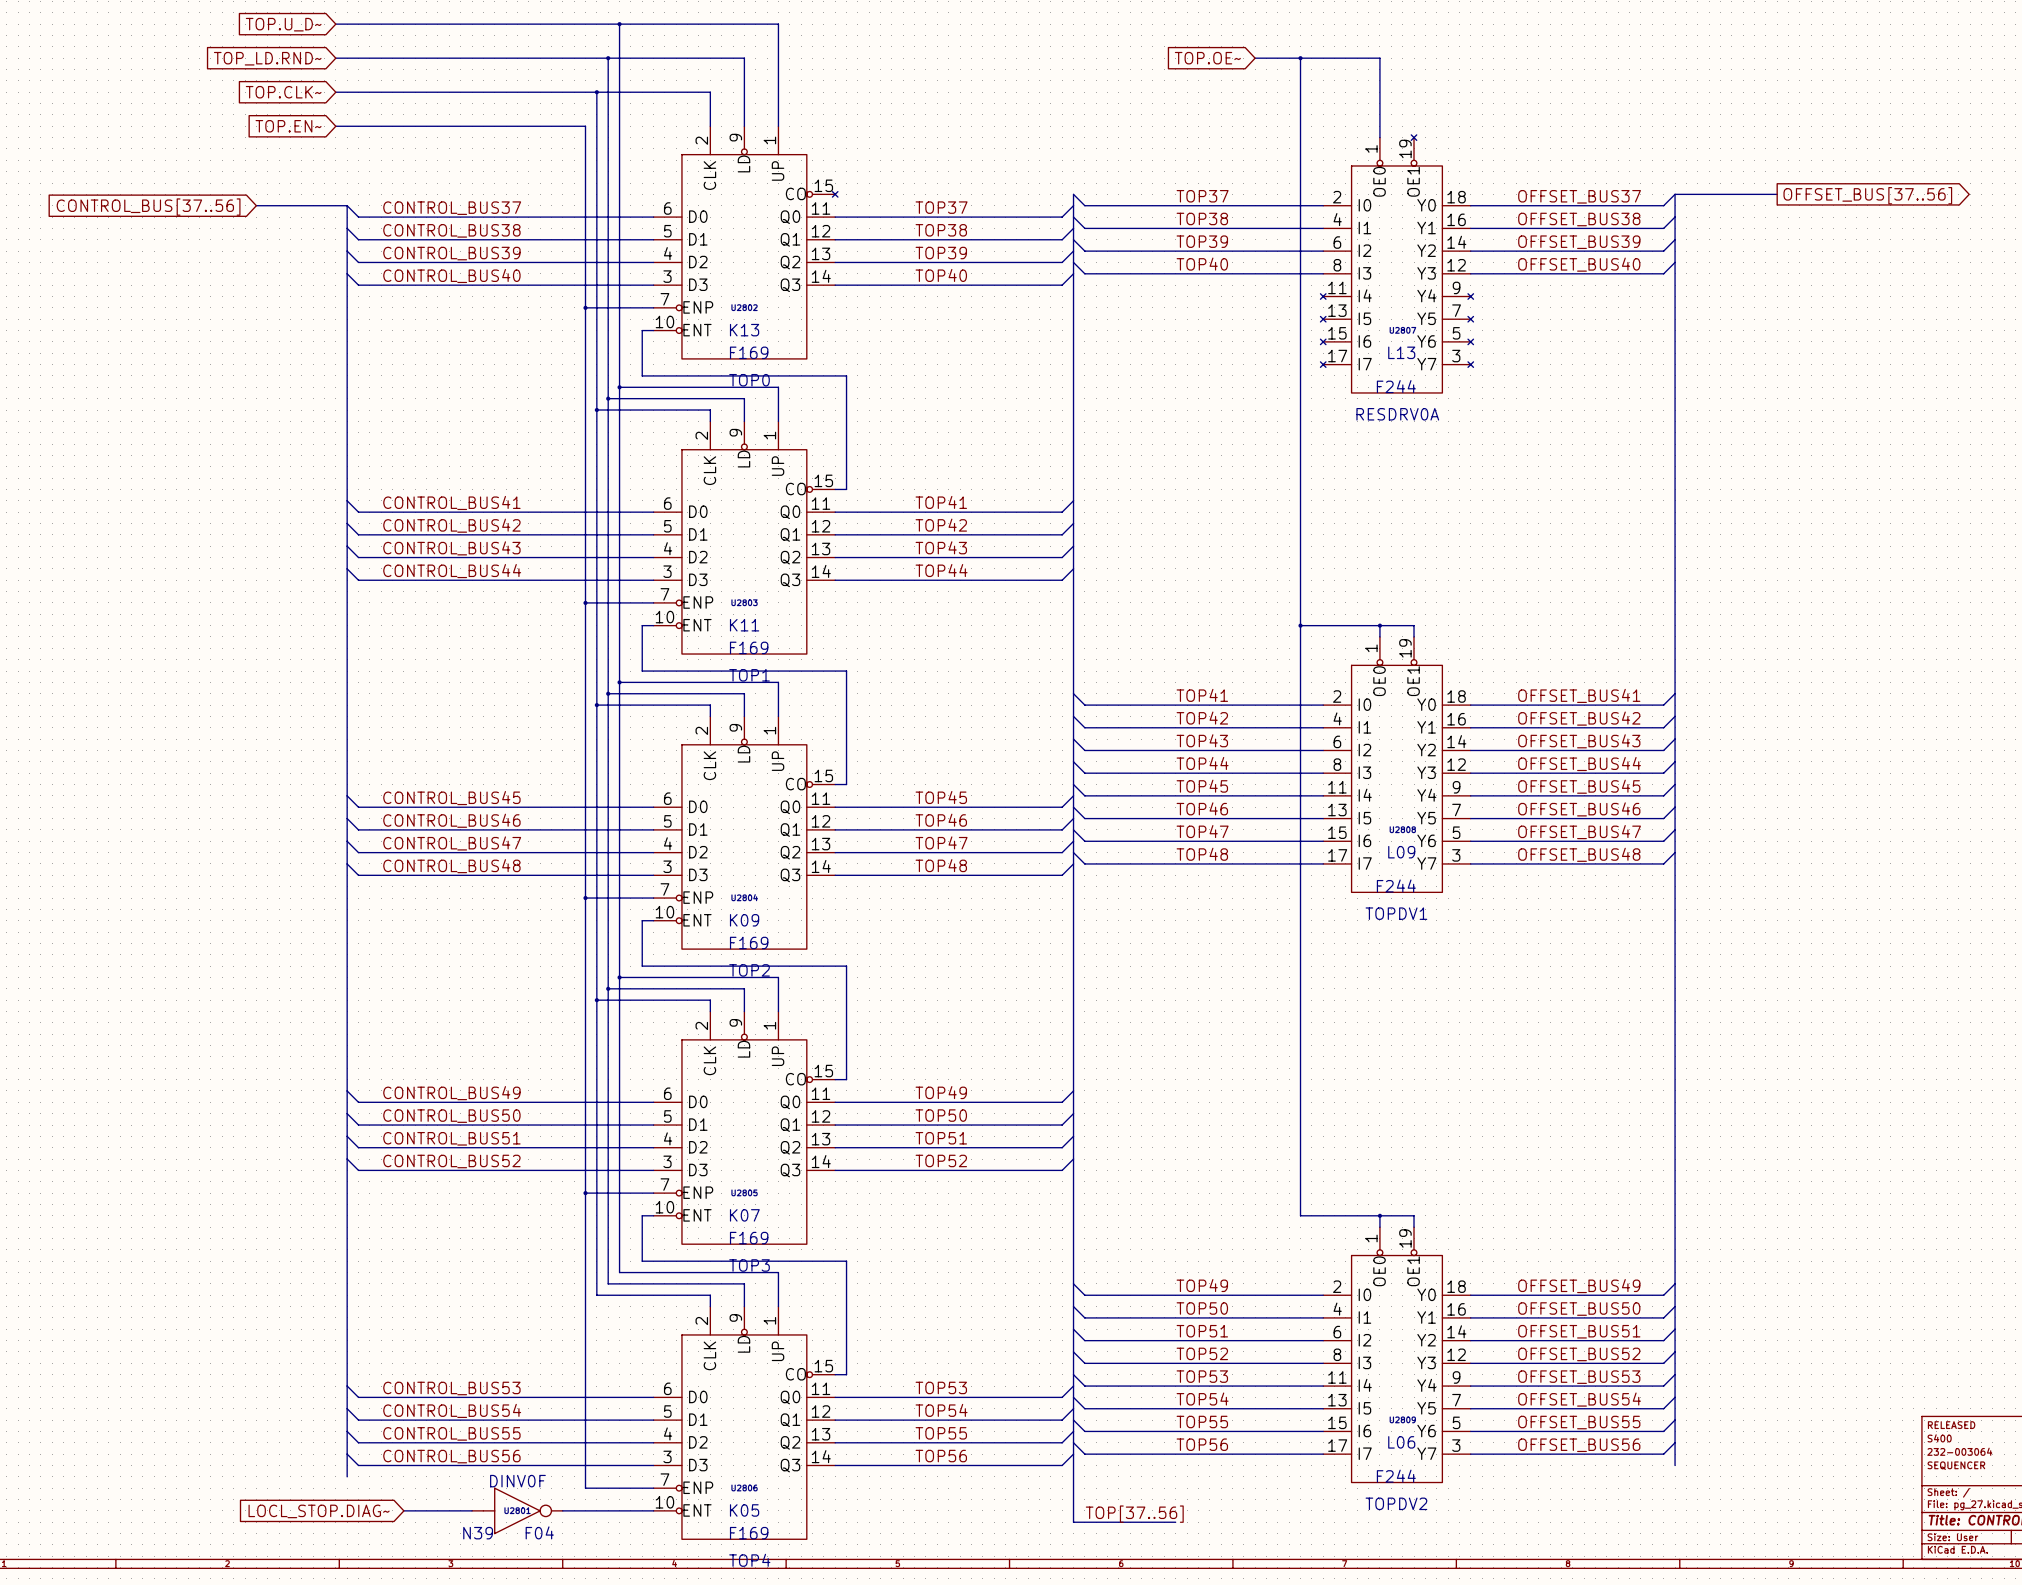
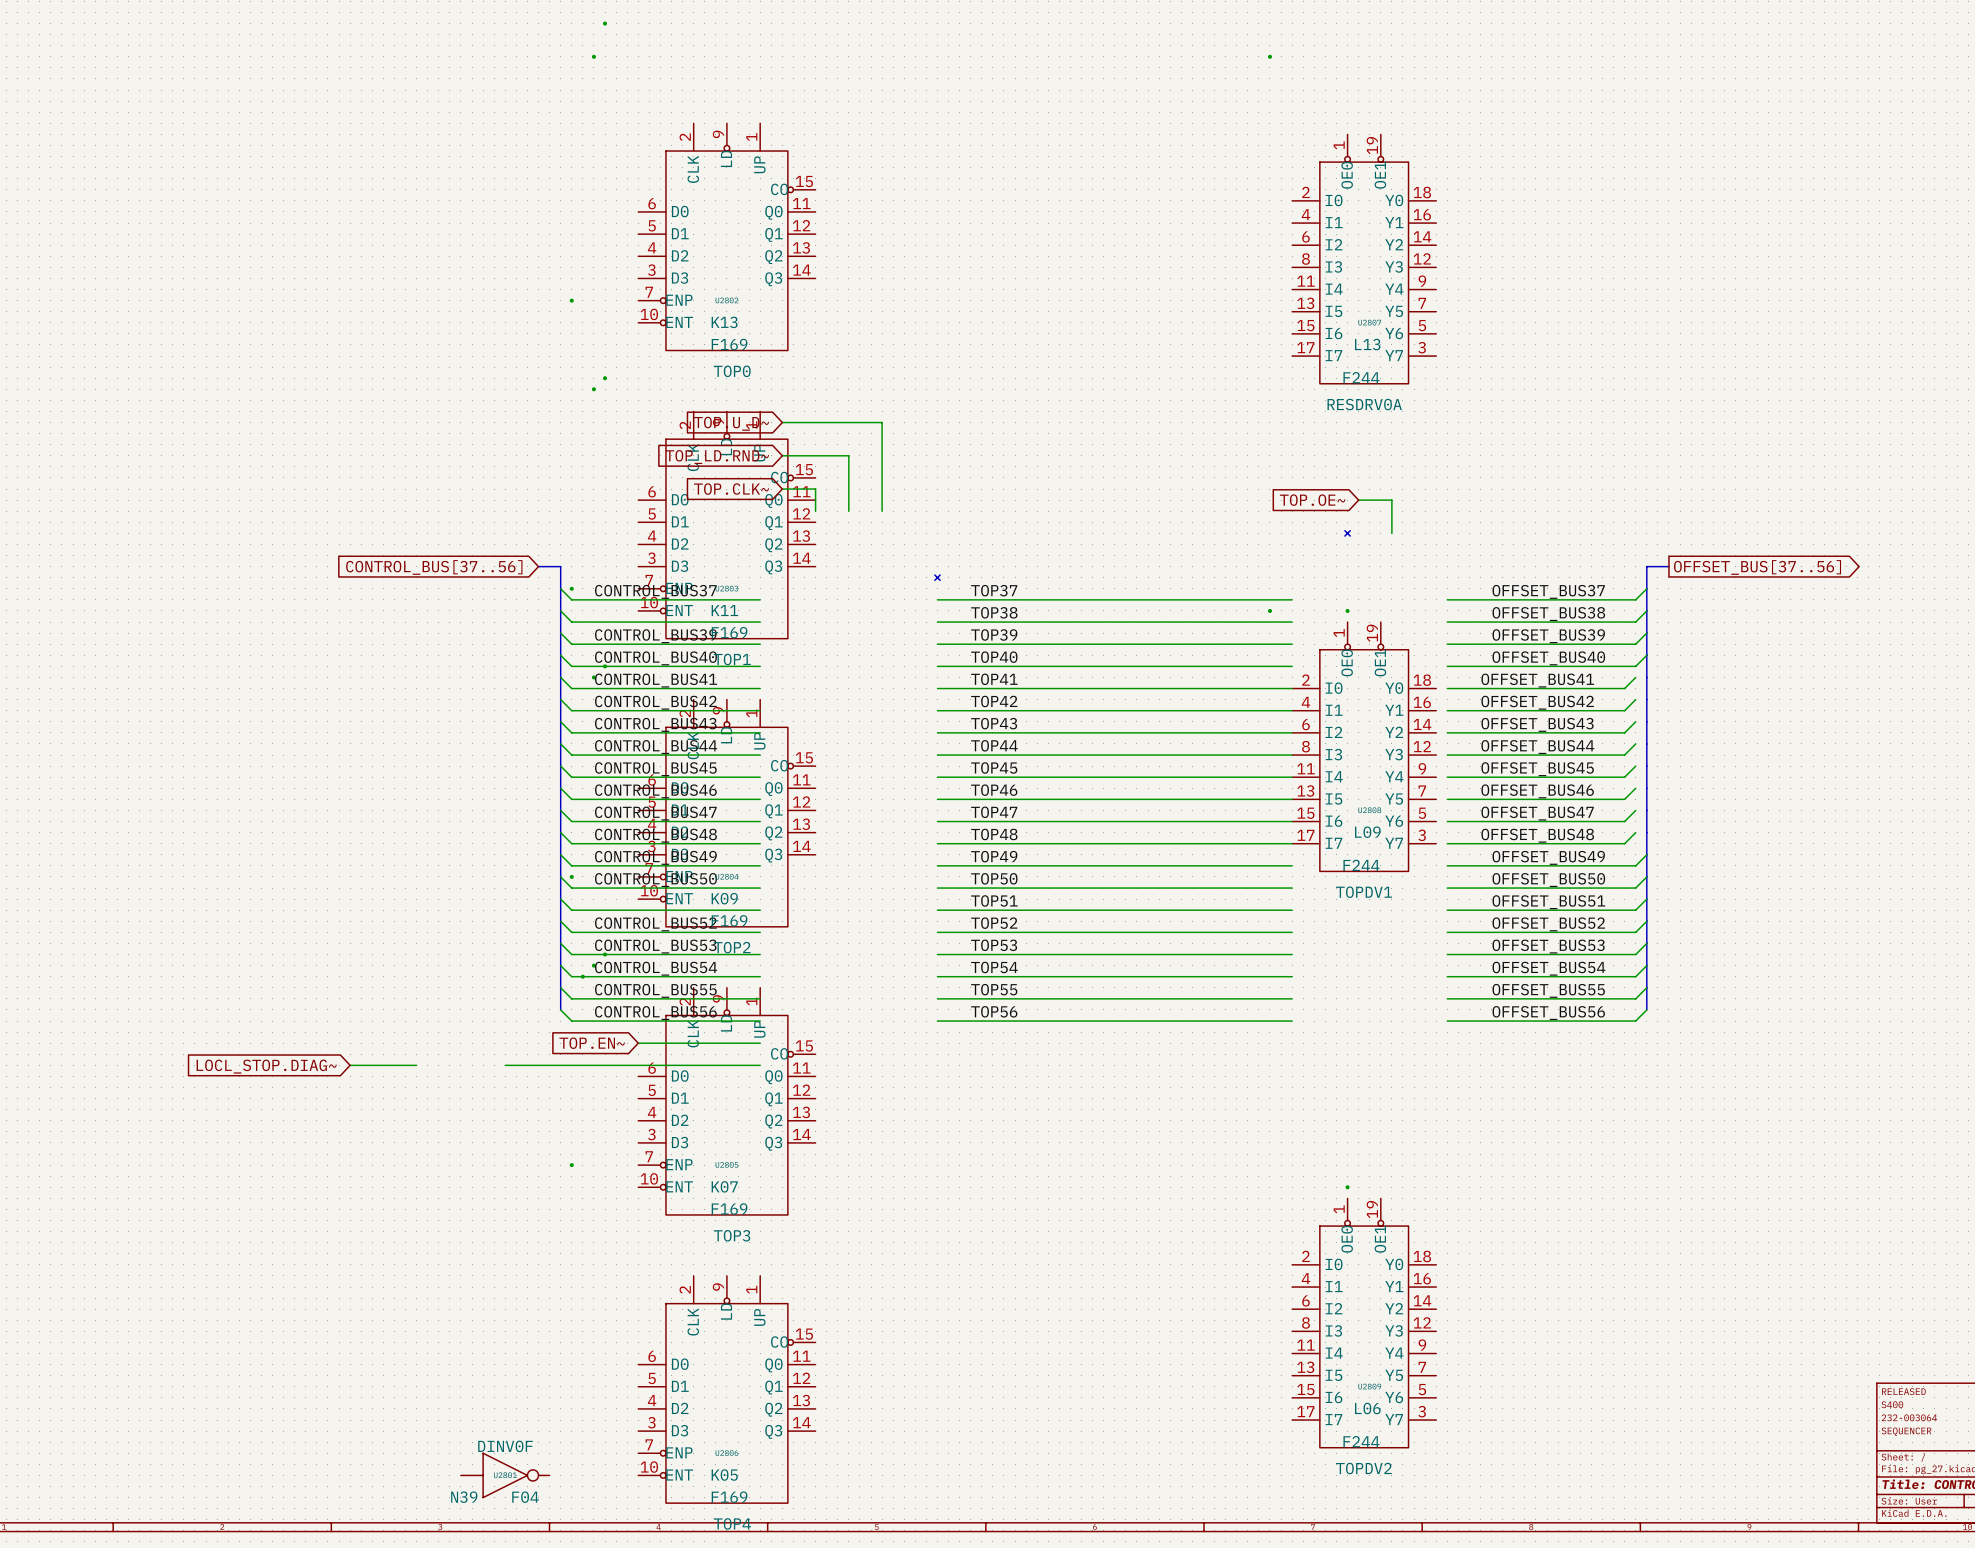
global label: TOP.U_D~ (283, 24) -> none
wire: (335, 24) (778, 24) (778, 126) -> none
wire: (619, 24) (619, 1272) (778, 1272) (778, 1306) -> none
global label: TOP_LD.RND~ (267, 58) -> none
wire: (335, 58) (744, 58) (744, 126) -> none
wire: (608, 58) (608, 1283) (744, 1283) (744, 1306) -> none
global label: TOP.OE~ (1207, 58) -> none
wire: (1255, 58) (1379, 58) (1379, 137) -> none
wire: (1300, 58) (1300, 1215) (1414, 1215) (1414, 1227) -> none
global label: TOP.CLK~ (283, 92) -> none
wire: (335, 92) (710, 92) (710, 126) -> none
wire: (596, 92) (596, 1295) (710, 1295) (710, 1306) -> none
junction: (596, 92) -> none
global label: TOP.EN~ (288, 126) -> none
wire: (335, 126) (585, 126) (585, 1488) (653, 1488) -> none
no-connect mark: (1414, 137) -> none
no-connect mark: (835, 194) -> none
bus: (1073, 194) (1073, 1522) (1175, 1522) -> none
wire: (1073, 194) (1084, 205) (1323, 205) -> none
wire: (1675, 194) (1663, 205) (1470, 205) -> none
bus: (1777, 194) (1675, 194) (1675, 1465) -> none
global label: OFFSET_BUS[37..56] (1867, 195) -> none
label: TOP37 (1202, 196) -> none
label: OFFSET_BUS37 (1579, 196) -> none
bus: (256, 205) (347, 205) (347, 1476) -> none
wire: (347, 205) (358, 217) (653, 217) -> none
wire: (1073, 205) (1062, 217) (835, 217) -> none
global label: CONTROL_BUS[37..56] (148, 207) -> none
label: TOP37 (941, 207) -> none
label: CONTROL_BUS37 (452, 208) -> none
wire: (1073, 217) (1084, 228) (1323, 228) -> none
wire: (1675, 217) (1663, 228) (1470, 228) -> none
label: TOP38 (1202, 218) -> none
label: OFFSET_BUS38 (1579, 219) -> none
wire: (347, 228) (358, 239) (653, 239) -> none
wire: (1073, 228) (1062, 239) (835, 239) -> none
label: CONTROL_BUS38 (451, 230) -> none
label: TOP38 (941, 230) -> none
wire: (1073, 239) (1084, 251) (1323, 251) -> none
wire: (1675, 239) (1663, 251) (1470, 251) -> none
label: TOP39 (1202, 241) -> none
label: OFFSET_BUS39 (1579, 242) -> none
wire: (347, 251) (358, 262) (653, 262) -> none
wire: (1073, 251) (1062, 262) (835, 262) -> none
label: CONTROL_BUS39 (451, 253) -> none
label: TOP39 (941, 253) -> none
wire: (1073, 262) (1084, 273) (1323, 273) -> none
wire: (1675, 262) (1663, 273) (1470, 273) -> none
label: TOP40 (1202, 264) -> none
label: OFFSET_BUS40 (1579, 264) -> none
wire: (347, 273) (358, 285) (653, 285) -> none
wire: (1073, 273) (1062, 285) (835, 285) -> none
label: CONTROL_BUS40 (451, 275) -> none
label: TOP40 (941, 275) -> none
no-connect mark: (1323, 296) -> none
no-connect mark: (1470, 296) -> none
wire: (585, 307) (653, 307) -> none
no-connect mark: (1323, 319) -> none
no-connect mark: (1470, 319) -> none
wire: (653, 330) (642, 330) (642, 375) (846, 375) (846, 489) (835, 489) -> none
no-connect mark: (1323, 341) -> none
no-connect mark: (1470, 341) -> none
no-connect mark: (1323, 364) -> none
no-connect mark: (1470, 364) -> none
wire: (619, 387) (778, 387) (778, 421) -> none
wire: (608, 398) (744, 398) (744, 421) -> none
wire: (596, 410) (710, 410) (710, 421) -> none
junction: (596, 410) -> none
wire: none -> (782, 422) (882, 422) (882, 511)
global label: none -> TOP.U_D~ (731, 423)
wire: none -> (782, 455) (848, 455) (848, 511)
global label: none -> TOP_LD.RND~ (717, 457)
wire: (347, 500) (358, 512) (653, 512) -> none
global label: none -> TOP.CLK~ (731, 489)
wire: none -> (782, 489) (815, 489) (815, 511)
wire: (1073, 500) (1062, 512) (835, 512) -> none
label: CONTROL_BUS41 (451, 502) -> none
label: TOP41 (941, 502) -> none
global label: none -> TOP.OE~ (1312, 500)
wire: none -> (1358, 500) (1391, 500) (1391, 533)
wire: (347, 523) (358, 534) (653, 534) -> none
wire: (1073, 523) (1062, 534) (835, 534) -> none
label: CONTROL_BUS42 (451, 525) -> none
label: TOP42 (941, 525) -> none
wire: (347, 546) (358, 557) (653, 557) -> none
wire: (1073, 546) (1062, 557) (835, 557) -> none
no-connect mark: none -> (1347, 533)
label: TOP43 (941, 547) -> none
label: CONTROL_BUS43 (451, 548) -> none
wire: (347, 568) (358, 580) (653, 580) -> none
wire: (1073, 568) (1062, 580) (835, 580) -> none
label: TOP44 (941, 570) -> none
label: CONTROL_BUS44 (452, 571) -> none
bus: none -> (538, 566) (560, 566) (560, 1009)
bus: none -> (1668, 566) (1646, 566) (1646, 1009)
global label: none -> CONTROL_BUS[37..56] (434, 567)
global label: none -> OFFSET_BUS[37..56] (1757, 567)
no-connect mark: none -> (937, 577)
wire: none -> (560, 588) (571, 599) (760, 599)
wire: (585, 602) (653, 602) -> none
wire: none -> (1646, 588) (1635, 599) (1447, 599)
label: none -> TOP37 (994, 590)
label: none -> CONTROL_BUS37 (655, 591)
label: none -> OFFSET_BUS37 (1548, 591)
wire: none -> (937, 599) (1292, 599)
wire: none -> (560, 610) (571, 622) (760, 622)
wire: (653, 625) (642, 625) (642, 671) (846, 671) (846, 784) (835, 784) -> none
wire: (1300, 625) (1414, 625) (1414, 636) -> none
wire: (1379, 625) (1379, 636) -> none
wire: none -> (1646, 610) (1635, 622) (1447, 622)
label: none -> TOP38 (994, 612)
label: none -> OFFSET_BUS38 (1548, 614)
wire: none -> (937, 622) (1292, 622)
wire: none -> (560, 633) (571, 644) (760, 644)
wire: none -> (1646, 633) (1635, 644) (1447, 644)
label: none -> CONTROL_BUS39 (655, 636)
label: none -> TOP39 (994, 634)
label: none -> OFFSET_BUS39 (1548, 636)
wire: none -> (937, 644) (1292, 644)
wire: none -> (560, 655) (571, 666) (605, 666)
wire: none -> (1646, 655) (1635, 666) (1447, 666)
label: none -> TOP40 (994, 657)
label: none -> CONTROL_BUS40 (655, 658)
label: none -> OFFSET_BUS40 (1548, 658)
wire: (778, 682) (778, 716) -> none
wire: none -> (937, 666) (1292, 666)
wire: none -> (560, 677) (571, 688) (582, 688)
wire: (608, 693) (744, 693) (744, 716) -> none
wire: (1073, 693) (1084, 705) -> (937, 688) (1059, 688)
label: none -> CONTROL_BUS41 (656, 680)
label: none -> TOP41 (994, 679)
label: TOP41 (1202, 695) -> none
junction: (596, 705) -> none
wire: (710, 705) (710, 716) -> (693, 688) (760, 688)
wire: (1470, 705) (1482, 705) -> none
wire: none -> (560, 699) (571, 710) (760, 710)
wire: (1073, 716) (1084, 727) -> (937, 710) (1059, 710)
label: none -> CONTROL_BUS42 (655, 702)
label: none -> TOP42 (994, 701)
label: TOP42 (1202, 718) -> none
wire: (1470, 727) (1482, 727) -> none
wire: none -> (560, 721) (571, 732) (760, 732)
wire: (1073, 739) (1084, 750) -> (937, 732) (1059, 732)
label: none -> TOP43 (994, 723)
label: TOP43 (1202, 740) -> none
label: none -> CONTROL_BUS43 (655, 724)
wire: (1470, 750) (1482, 750) -> none
wire: none -> (560, 743) (571, 755) (760, 755)
wire: (1073, 761) (1084, 773) -> (937, 755) (1059, 755)
label: none -> TOP44 (994, 745)
label: TOP44 (1202, 763) -> none
label: none -> CONTROL_BUS44 (656, 747)
wire: (1470, 773) (1482, 773) -> none
wire: none -> (560, 766) (571, 777) (760, 777)
wire: (1073, 784) (1084, 795) -> (937, 777) (1059, 777)
label: none -> CONTROL_BUS45 (655, 769)
label: TOP45 (1202, 786) -> none
wire: (347, 795) (358, 807) (653, 807) -> none
wire: (1073, 795) (1062, 807) (835, 807) -> none
wire: (1470, 795) (1482, 795) -> none
label position: TOP45 (941, 797) -> TOP45 (994, 767)
label: CONTROL_BUS45 (451, 798) -> none
wire: none -> (560, 788) (571, 799) (760, 799)
wire: (1073, 807) (1084, 818) -> (937, 799) (1059, 799)
label: TOP46 (1202, 808) -> none
label: none -> CONTROL_BUS46 (655, 791)
wire: (347, 818) (358, 829) (653, 829) -> none
wire: (1073, 818) (1062, 829) (835, 829) -> none
wire: (1470, 818) (1482, 818) -> none
label: CONTROL_BUS46 (451, 820) -> none
label position: TOP46 (941, 820) -> TOP46 (994, 790)
wire: none -> (560, 810) (571, 821) (760, 821)
wire: (1073, 829) (1084, 841) -> (937, 821) (1059, 821)
label: TOP47 (1202, 831) -> none
label: none -> CONTROL_BUS47 (655, 813)
wire: (347, 841) (358, 852) (653, 852) -> none
wire: (1073, 841) (1062, 852) (835, 852) -> none
wire: (1470, 841) (1482, 841) -> none
label position: TOP47 (941, 842) -> TOP47 (994, 812)
label: CONTROL_BUS47 (452, 843) -> none
wire: none -> (560, 832) (571, 843) (760, 843)
wire: (1073, 852) (1084, 863) -> (937, 843) (1059, 843)
label: none -> CONTROL_BUS48 (655, 835)
label: TOP48 (1202, 854) -> none
wire: (347, 863) (358, 875) (653, 875) -> none
wire: (1073, 863) (1062, 875) (835, 875) -> none
wire: (1470, 863) (1482, 863) -> none
label position: TOP48 (941, 865) -> TOP48 (994, 834)
label: CONTROL_BUS48 (451, 866) -> none
wire: none -> (560, 854) (571, 865) (760, 865)
wire: none -> (1646, 854) (1635, 865) (1447, 865)
label: none -> TOP49 (994, 856)
label: none -> CONTROL_BUS49 (655, 857)
label: none -> OFFSET_BUS49 (1548, 857)
wire: none -> (937, 865) (1292, 865)
wire: none -> (560, 876) (571, 888) (760, 888)
wire: (585, 898) (653, 898) -> none
wire: none -> (1646, 876) (1635, 888) (1447, 888)
label: none -> TOP50 (994, 878)
label: none -> CONTROL_BUS50 (655, 880)
label: none -> OFFSET_BUS50 (1548, 880)
wire: none -> (937, 888) (1292, 888)
wire: none -> (560, 899) (571, 910) (760, 910)
wire: (653, 920) (642, 920) (642, 966) (846, 966) (846, 1079) (835, 1079) -> none
wire: none -> (1646, 899) (1635, 910) (1447, 910)
label: none -> TOP51 (994, 900)
label: none -> OFFSET_BUS51 (1548, 902)
wire: none -> (937, 910) (1292, 910)
wire: none -> (560, 921) (571, 932) (760, 932)
wire: none -> (1646, 921) (1635, 932) (1447, 932)
label: none -> CONTROL_BUS52 (655, 924)
label: none -> TOP52 (994, 923)
label: none -> OFFSET_BUS52 (1548, 924)
wire: none -> (937, 932) (1292, 932)
wire: none -> (560, 943) (571, 954) (605, 954)
wire: none -> (1646, 943) (1635, 954) (1447, 954)
label: none -> CONTROL_BUS53 (655, 946)
label: none -> TOP53 (994, 945)
label: none -> OFFSET_BUS53 (1548, 946)
wire: (778, 977) (778, 1011) -> none
wire: none -> (937, 954) (1292, 954)
wire: none -> (560, 965) (571, 976) (582, 976)
wire: (608, 988) (744, 988) (744, 1011) -> none
wire: none -> (1646, 965) (1635, 976) (1447, 976)
label: none -> CONTROL_BUS54 (656, 968)
label: none -> TOP54 (994, 967)
label: none -> OFFSET_BUS54 (1548, 968)
wire: (710, 1000) (710, 1011) -> (693, 976) (760, 976)
wire: none -> (937, 976) (1292, 976)
wire: none -> (560, 987) (571, 998) (760, 998)
wire: none -> (1646, 987) (1635, 998) (1447, 998)
label: none -> CONTROL_BUS55 (655, 990)
label: none -> TOP55 (994, 989)
label: none -> OFFSET_BUS55 (1548, 990)
wire: none -> (937, 998) (1292, 998)
wire: none -> (560, 1009) (571, 1021) (760, 1021)
wire: none -> (1646, 1009) (1635, 1021) (1447, 1021)
label: none -> CONTROL_BUS56 (655, 1013)
label: none -> TOP56 (994, 1011)
label: none -> OFFSET_BUS56 (1548, 1013)
wire: none -> (937, 1021) (1292, 1021)
global label: none -> TOP.EN~ (592, 1043)
wire: none -> (638, 1043) (760, 1043)
wire: (347, 1090) (358, 1102) (653, 1102) -> none
wire: none -> (350, 1065) (416, 1065)
wire: none -> (505, 1065) (760, 1065)
wire: (1073, 1090) (1062, 1102) (835, 1102) -> none
global label: none -> LOCL_STOP.DIAG~ (266, 1066)
label: TOP49 (941, 1092) -> none
label: CONTROL_BUS49 (451, 1093) -> none
wire: (347, 1113) (358, 1125) (653, 1125) -> none
wire: (1073, 1113) (1062, 1125) (835, 1125) -> none
label: TOP50 (941, 1115) -> none
label: CONTROL_BUS50 (451, 1116) -> none
wire: (347, 1136) (358, 1147) (653, 1147) -> none
wire: (1073, 1136) (1062, 1147) (835, 1147) -> none
label: CONTROL_BUS51 (451, 1138) -> none
label: TOP51 (941, 1138) -> none
wire: (347, 1159) (358, 1170) (653, 1170) -> none
wire: (1073, 1159) (1062, 1170) (835, 1170) -> none
label: TOP52 (941, 1160) -> none
label: CONTROL_BUS52 (451, 1161) -> none
wire: (585, 1193) (653, 1193) -> none
wire: (653, 1215) (642, 1215) (642, 1261) (846, 1261) (846, 1374) (835, 1374) -> none
wire: (1379, 1215) (1379, 1227) -> none
wire: (1073, 1283) (1084, 1295) (1323, 1295) -> none
wire: (1675, 1283) (1663, 1295) (1470, 1295) -> none
label: TOP49 (1202, 1285) -> none
label: OFFSET_BUS49 (1579, 1286) -> none
wire: (1073, 1306) (1084, 1317) (1323, 1317) -> none
wire: (1675, 1306) (1663, 1317) (1470, 1317) -> none
label: TOP50 (1202, 1308) -> none
label: OFFSET_BUS50 (1579, 1309) -> none
wire: (1073, 1329) (1084, 1340) (1323, 1340) -> none
wire: (1675, 1329) (1663, 1340) (1470, 1340) -> none
label: TOP51 (1202, 1331) -> none
label: OFFSET_BUS51 (1579, 1331) -> none
wire: (1073, 1351) (1084, 1363) (1323, 1363) -> none
wire: (1675, 1351) (1663, 1363) (1470, 1363) -> none
label: TOP52 (1202, 1353) -> none
label: OFFSET_BUS52 (1579, 1354) -> none
wire: (1073, 1374) (1084, 1386) (1323, 1386) -> none
wire: (1675, 1374) (1663, 1386) (1470, 1386) -> none
label: TOP53 (1202, 1376) -> none
label: OFFSET_BUS53 (1579, 1377) -> none
wire: (347, 1386) (358, 1397) (653, 1397) -> none
wire: (1073, 1386) (1062, 1397) (835, 1397) -> none
label: TOP53 (941, 1387) -> none
label: CONTROL_BUS53 (451, 1388) -> none
wire: (1073, 1397) (1084, 1408) (1323, 1408) -> none
wire: (1675, 1397) (1663, 1408) (1470, 1408) -> none
label: TOP54 (1202, 1399) -> none
label: OFFSET_BUS54 (1579, 1399) -> none
wire: (347, 1408) (358, 1420) (653, 1420) -> none
wire: (1073, 1408) (1062, 1420) (835, 1420) -> none
label: CONTROL_BUS54 (452, 1410) -> none
label: TOP54 (941, 1410) -> none
wire: (1073, 1420) (1084, 1431) (1323, 1431) -> none
wire: (1675, 1420) (1663, 1431) (1470, 1431) -> none
label: TOP55 (1202, 1421) -> none
label: OFFSET_BUS55 (1579, 1422) -> none
wire: (347, 1431) (358, 1442) (653, 1442) -> none
wire: (1073, 1431) (1062, 1442) (835, 1442) -> none
label: CONTROL_BUS55 (451, 1433) -> none
label: TOP55 (941, 1433) -> none
wire: (1073, 1442) (1084, 1454) (1323, 1454) -> none
wire: (1675, 1442) (1663, 1454) (1470, 1454) -> none
label: TOP56 (1202, 1444) -> none
label: OFFSET_BUS56 (1579, 1445) -> none
wire: (347, 1454) (358, 1465) (653, 1465) -> none
wire: (1073, 1454) (1062, 1465) (835, 1465) -> none
label: CONTROL_BUS56 (451, 1456) -> none
label: TOP56 (941, 1456) -> none
wire: (403, 1510) (472, 1510) -> none
wire: (562, 1510) (653, 1510) -> none
global label: LOCL_STOP.DIAG~ (319, 1511) -> none
label: TOP[37..56] (1134, 1514) -> none

